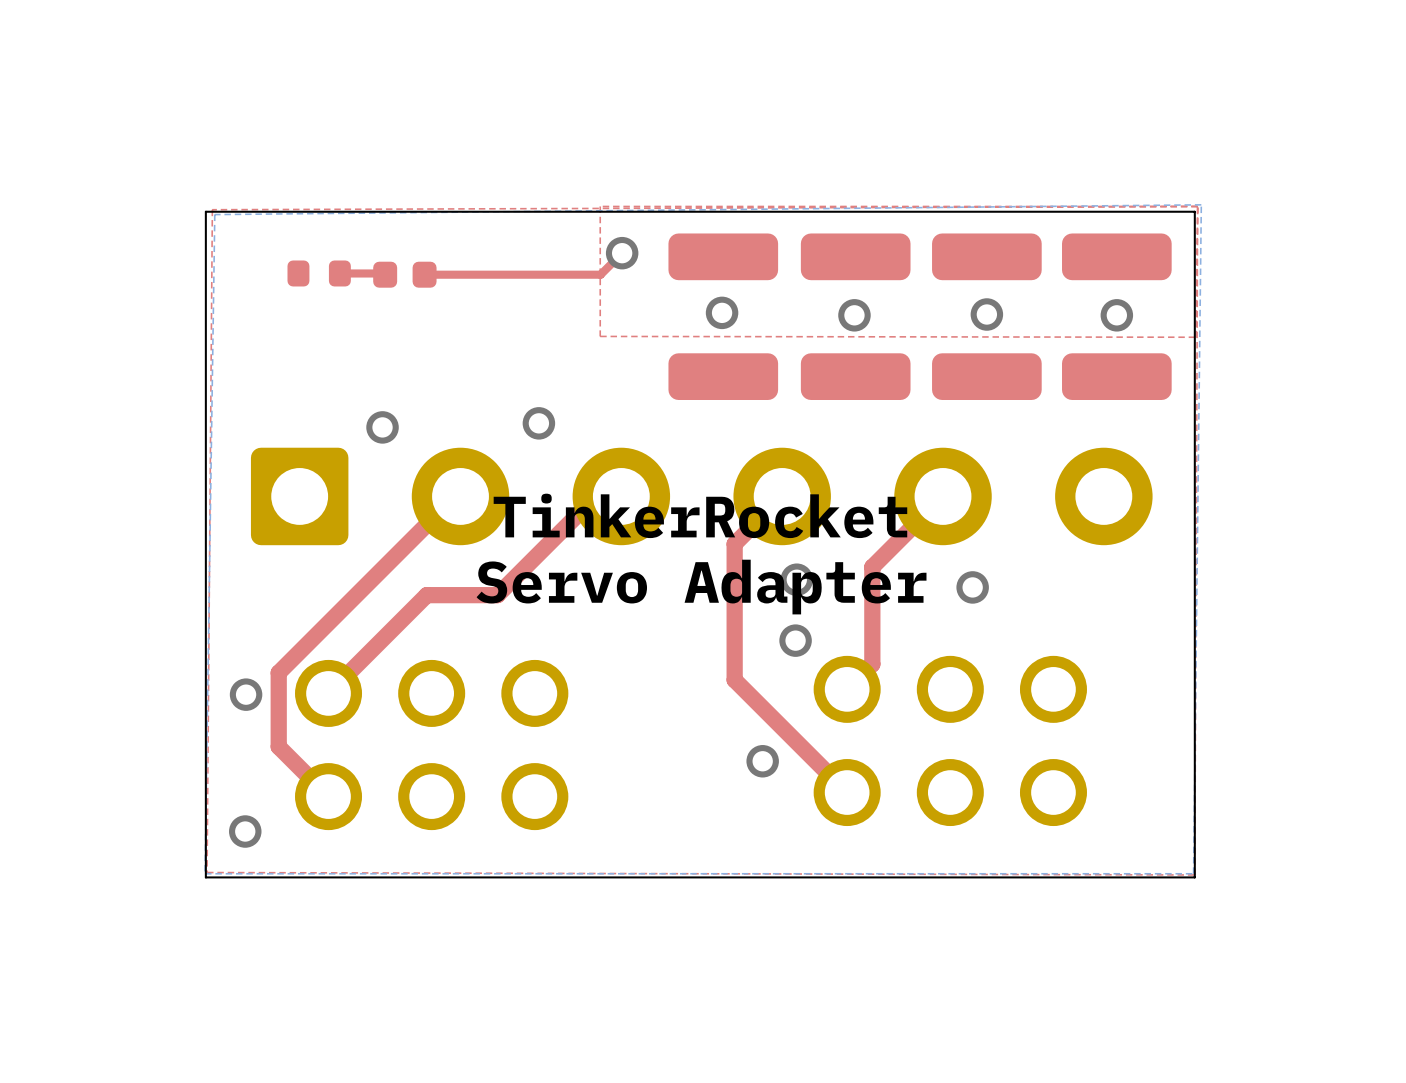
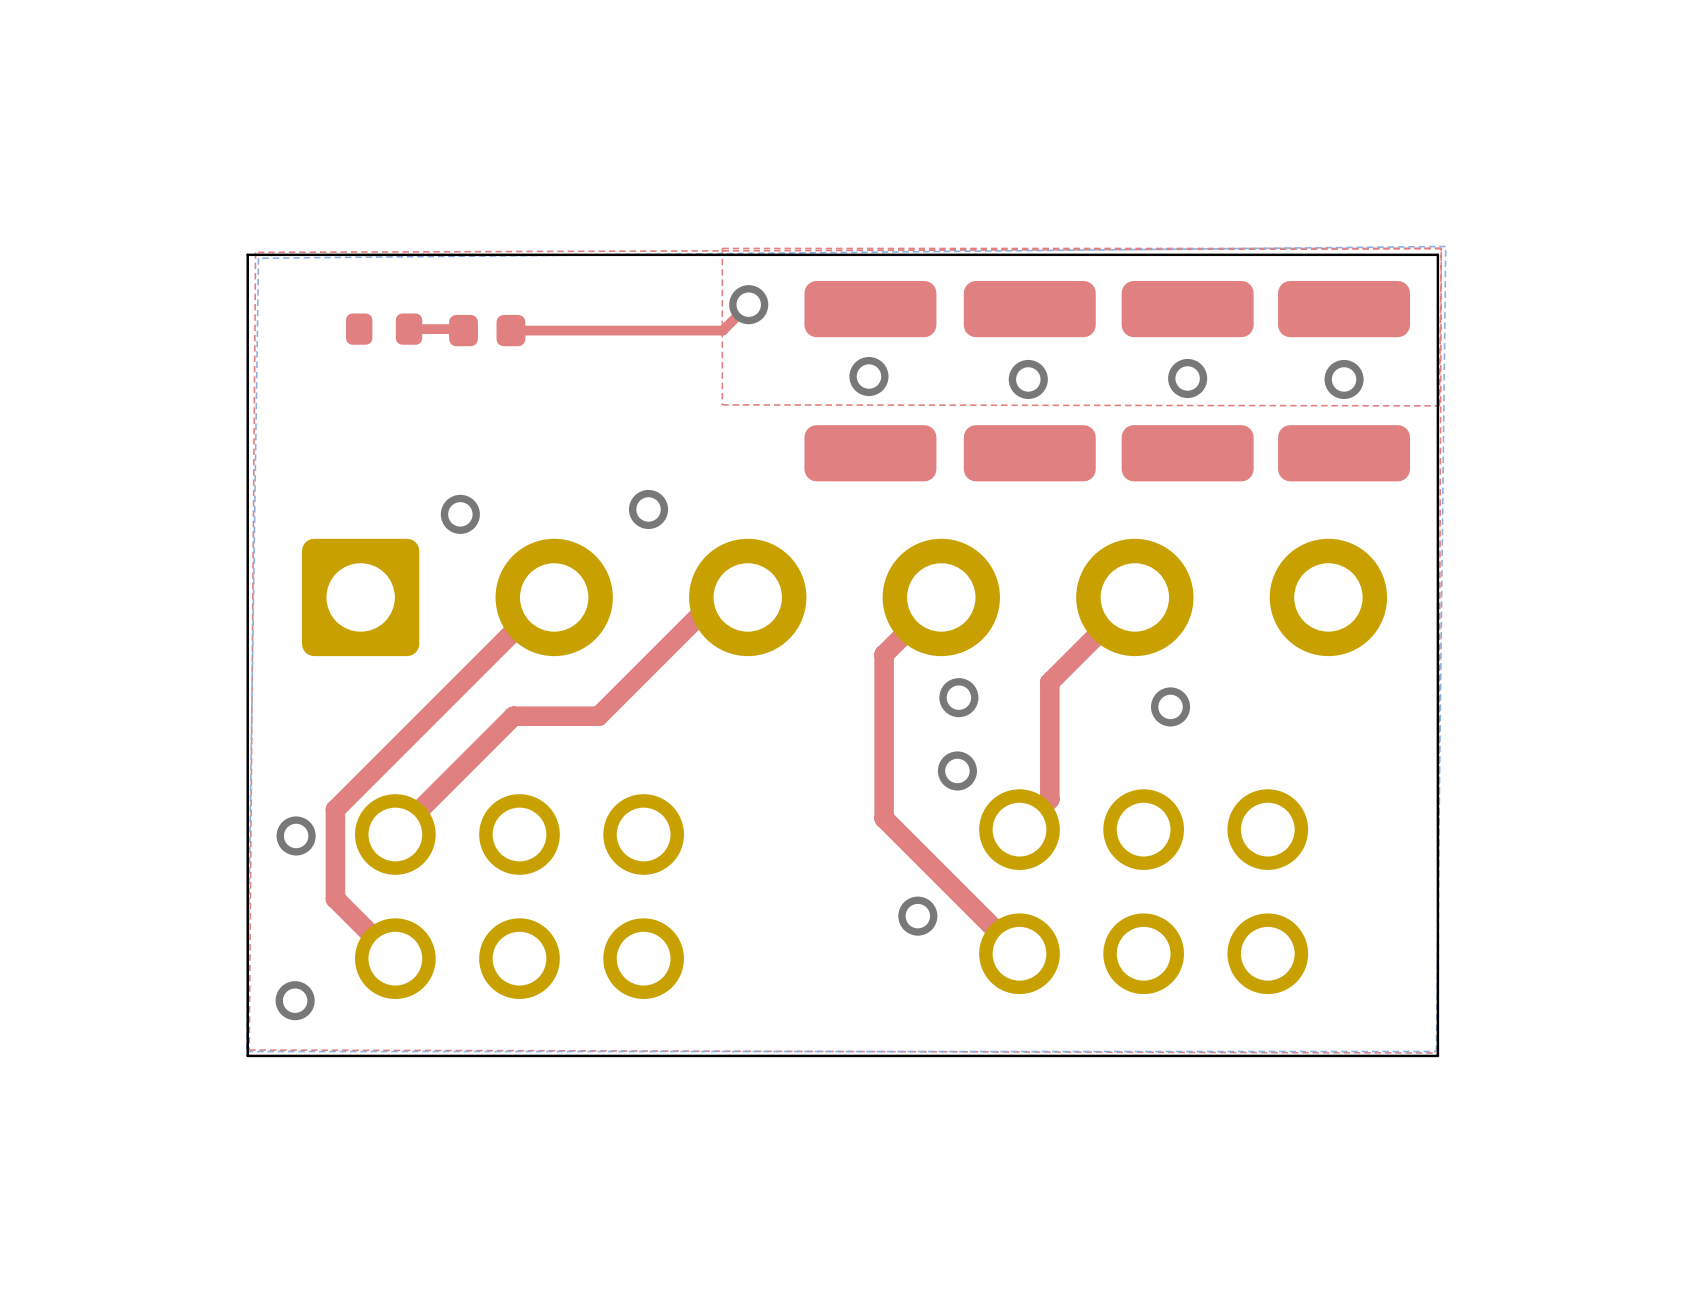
text: TinkerRocket (700, 515) -> none
text: Servo Adapter (701, 587) -> none

